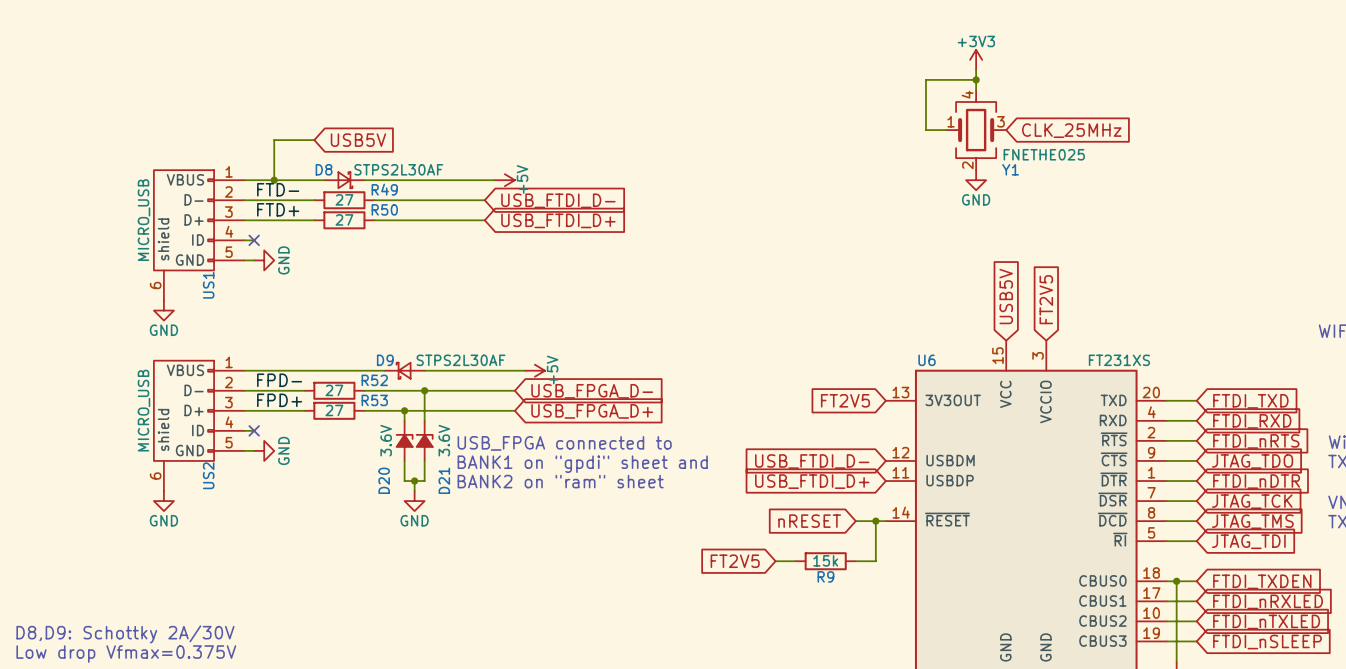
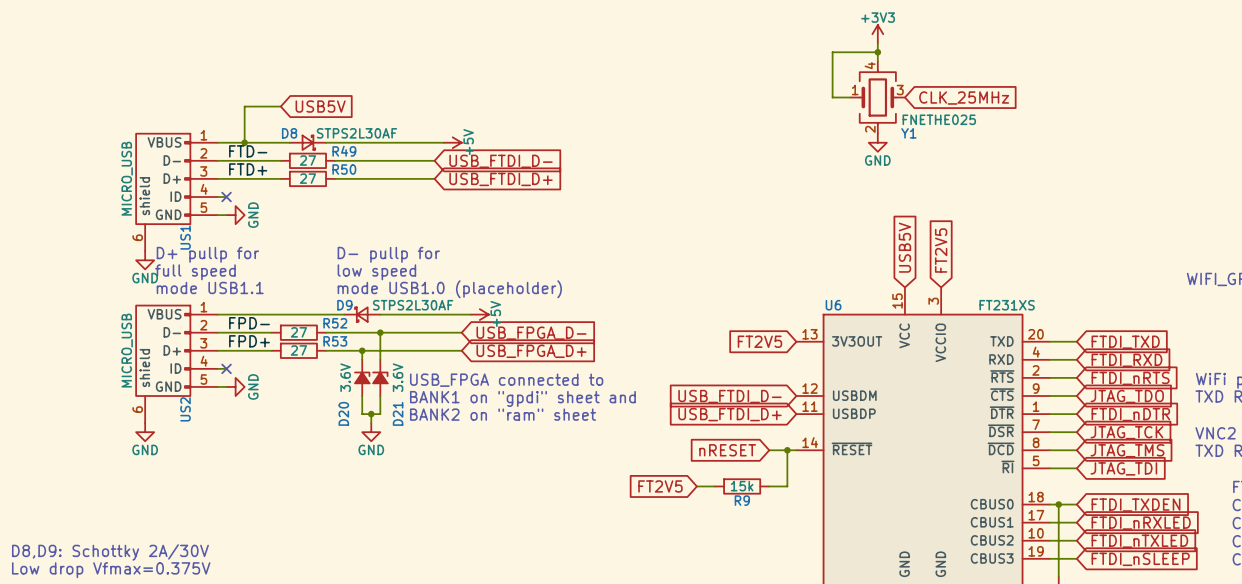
text: none -> D+ pullp for (207, 254)
text: none -> D- pullp for (388, 254)
text: none -> full speed (195, 272)
text: none -> low speed (376, 272)
text: none -> mode USB1.1 (210, 287)
text: none -> mode USB1.0 (placeholder) (449, 289)

